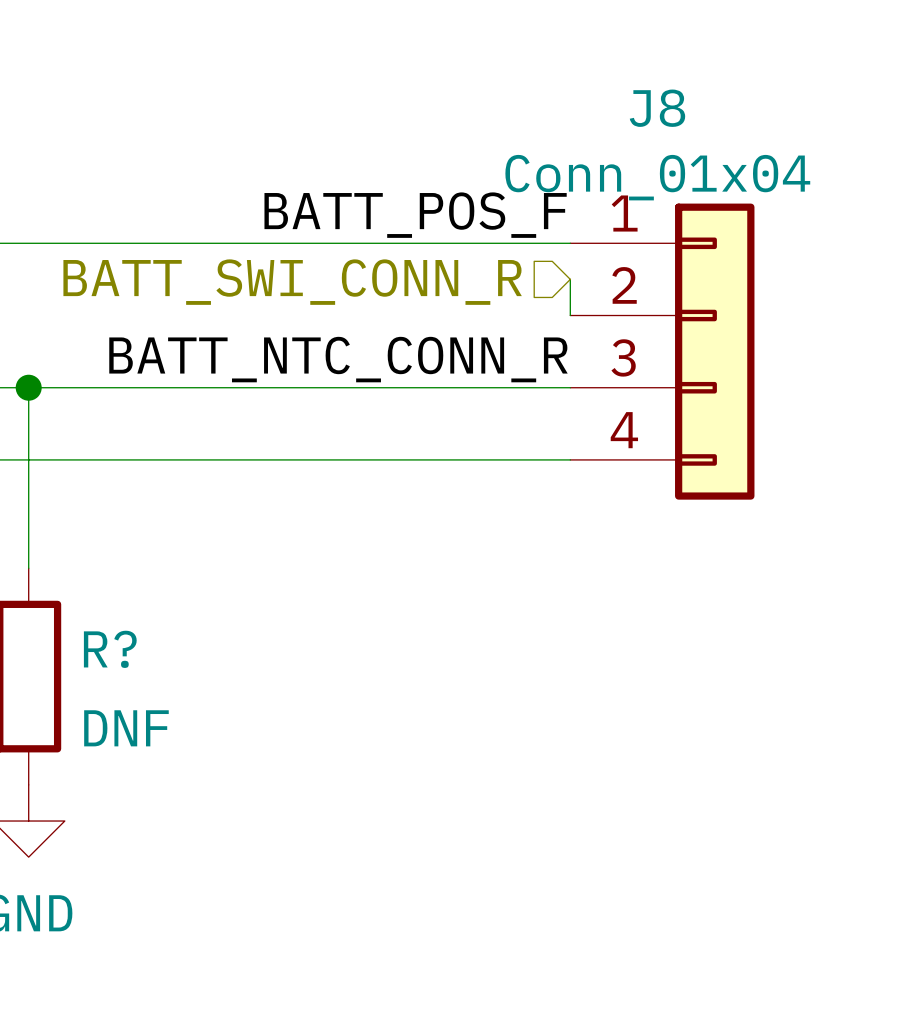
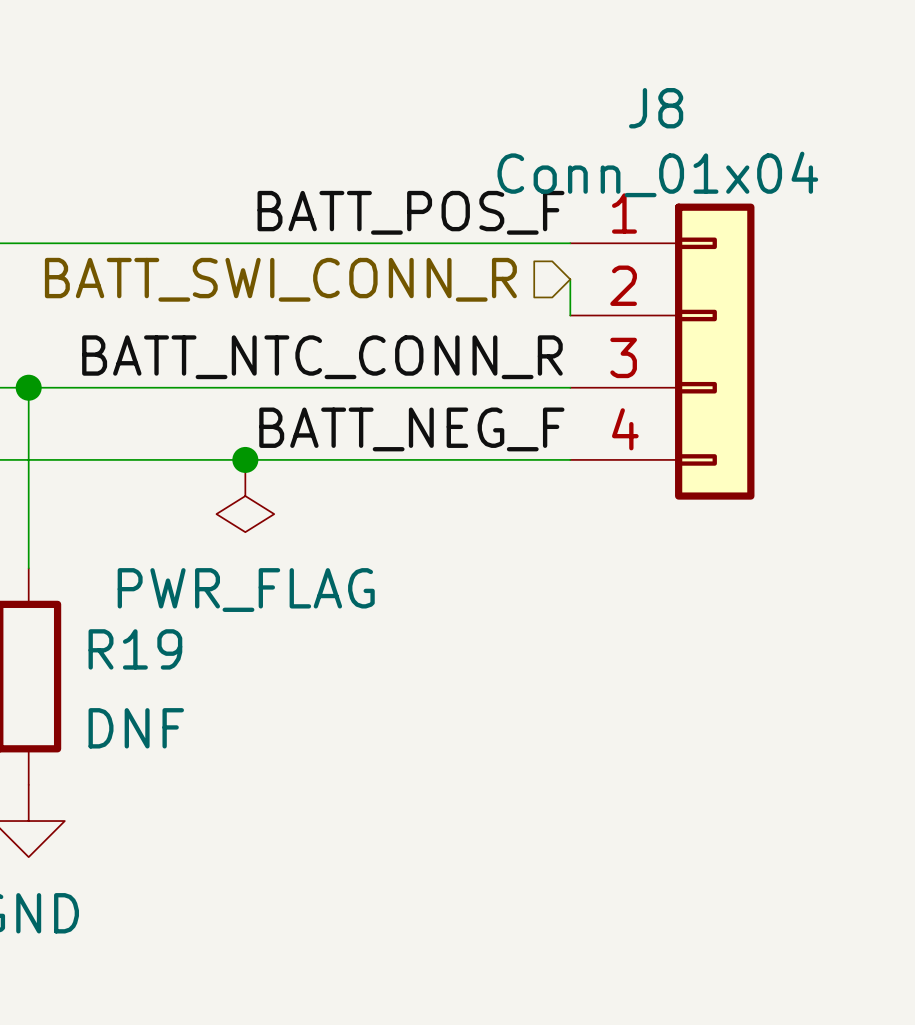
label: none -> BATT_NEG_F (411, 429)
junction: none -> (245, 459)
power symbol: none -> PWR_FLAG (245, 496)
R? name: R? (110, 649) -> R19 (135, 649)

